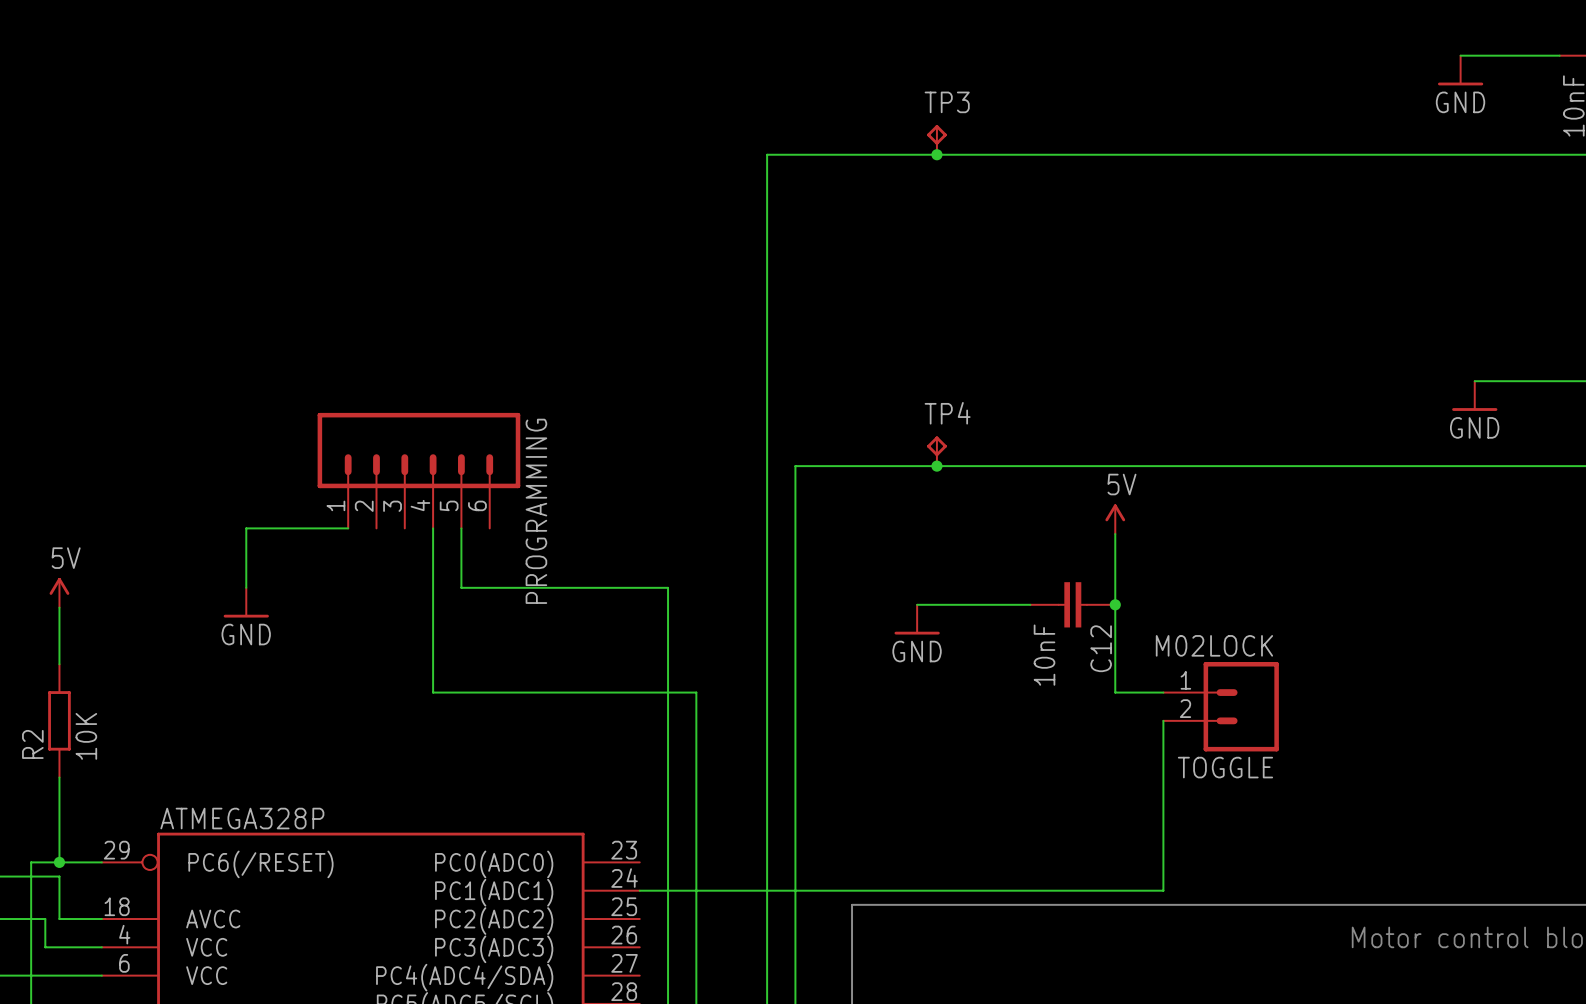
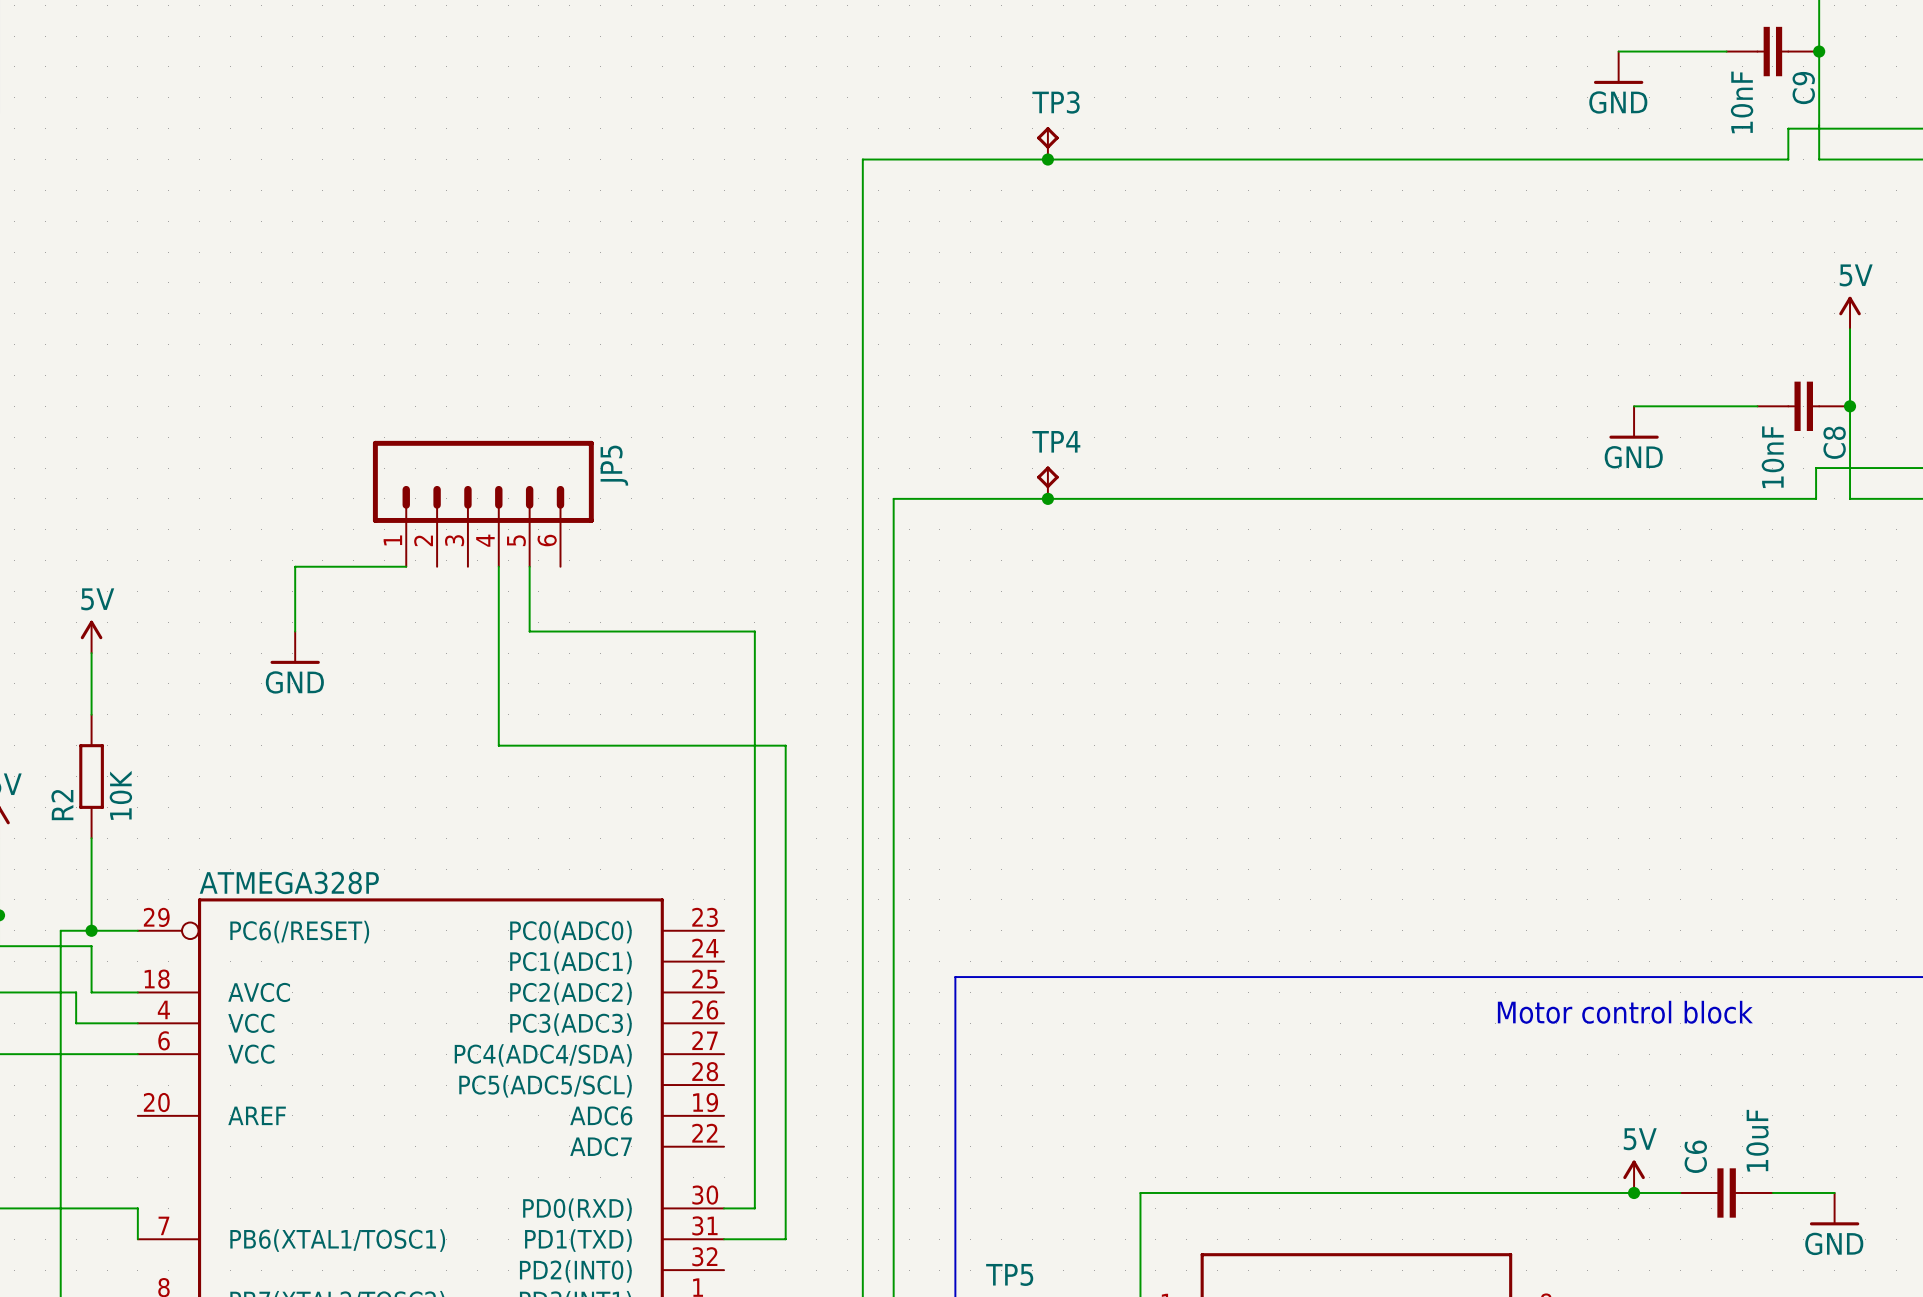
PROGRAMMING name: PROGRAMMING (536, 511) -> JP5 (614, 465)
power symbol: 5V (1115, 519) -> none
wire: (1115, 534) (1115, 692) (1163, 692) -> none
wire: (917, 604) (1030, 604) -> none
C12: 10nF (1072, 604) -> none
junction: (1115, 604) -> none
power symbol: GND (917, 619) -> none
TOGGLE: M02LOCK (1221, 706) -> none
wire: (1163, 720) (1163, 890) (639, 890) -> none

